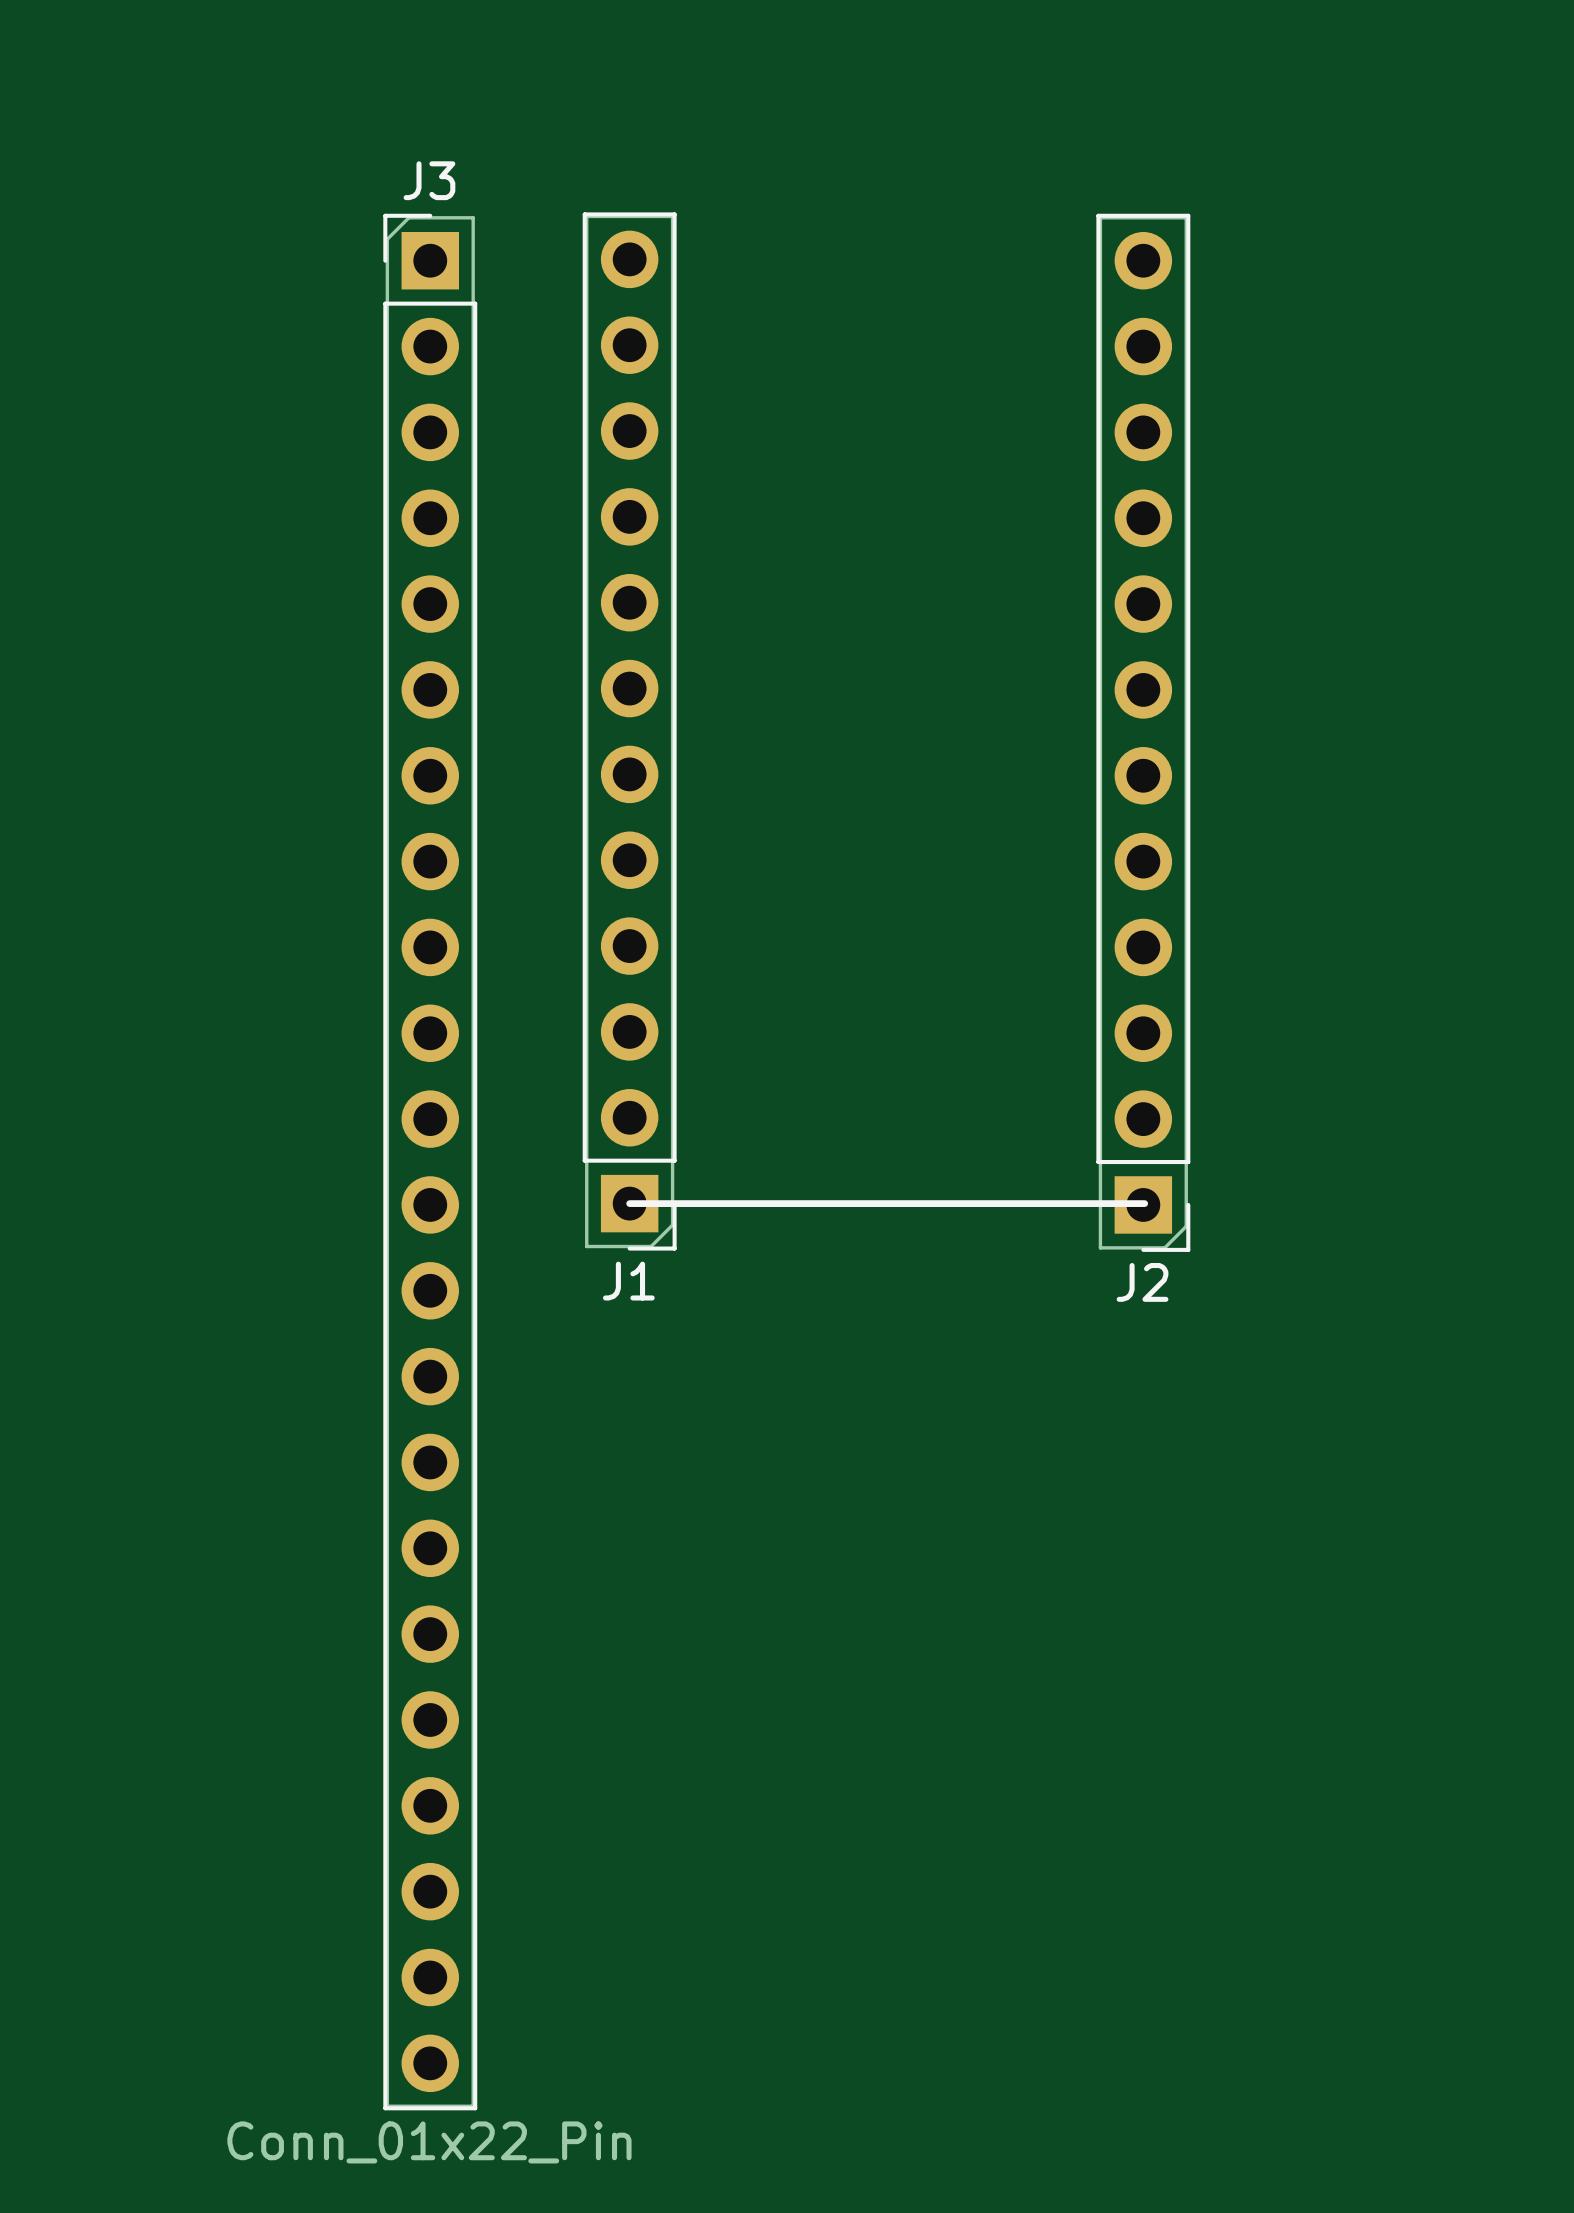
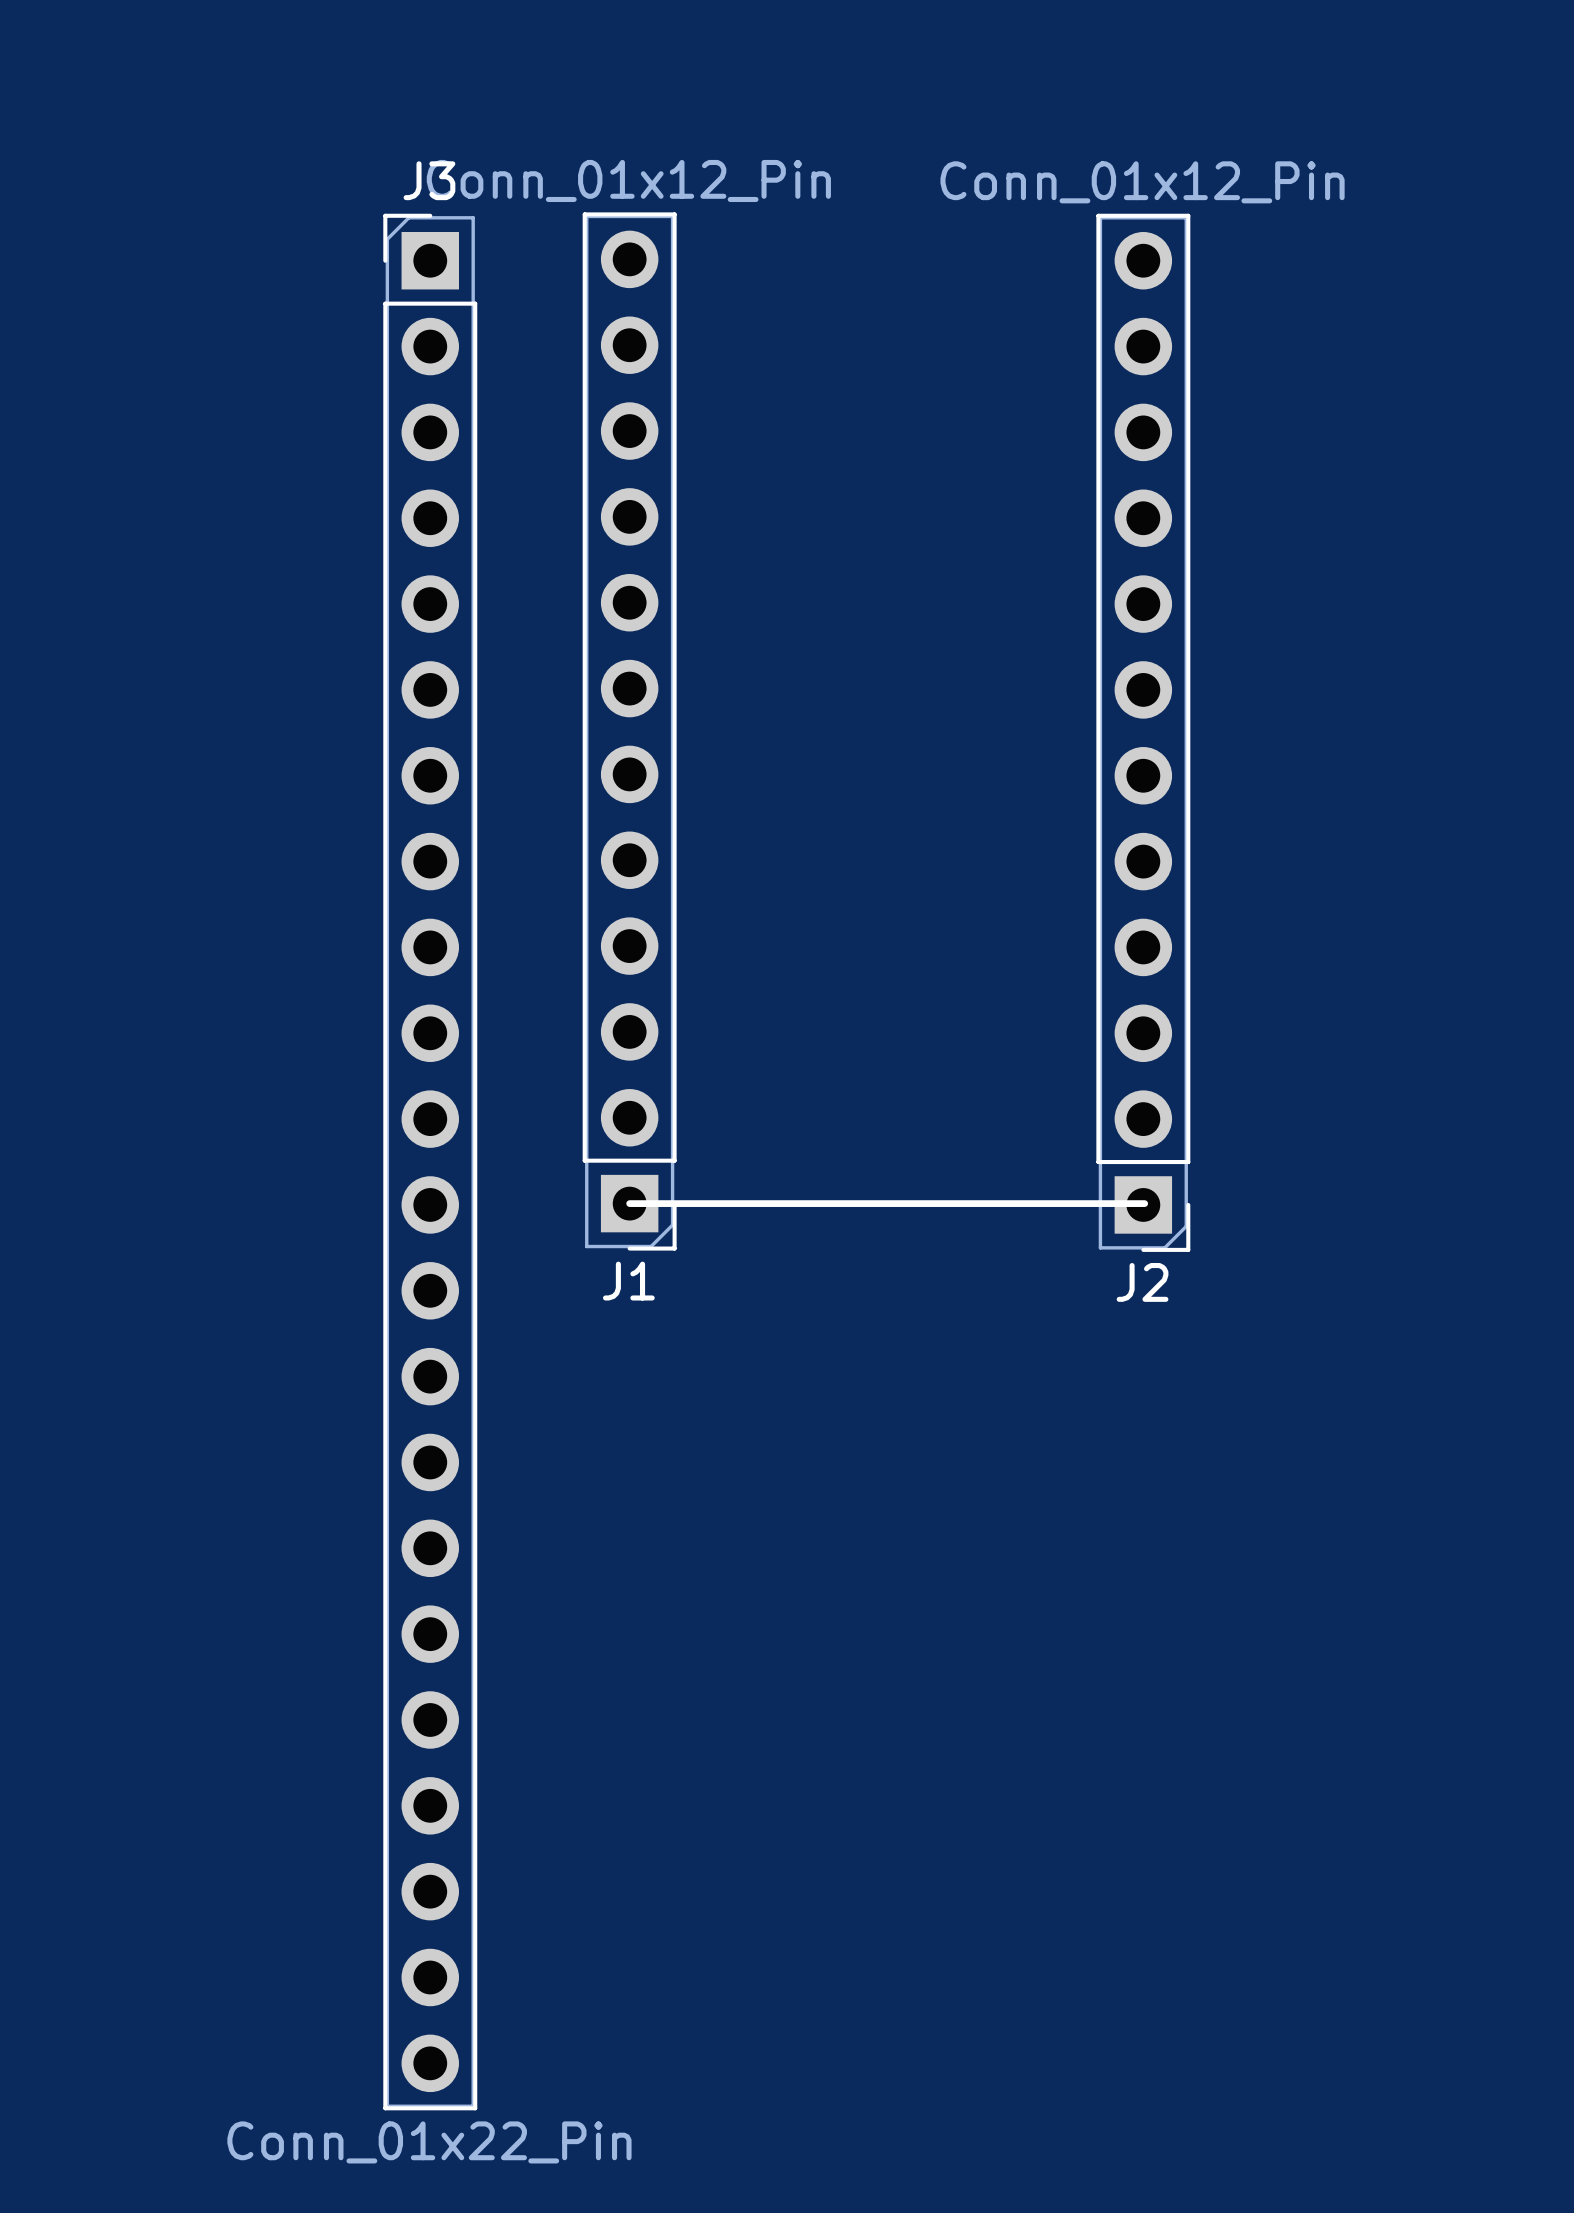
J1 value: none -> Conn_01x12_Pin (628, 180)
J2 value: none -> Conn_01x12_Pin (1142, 182)

